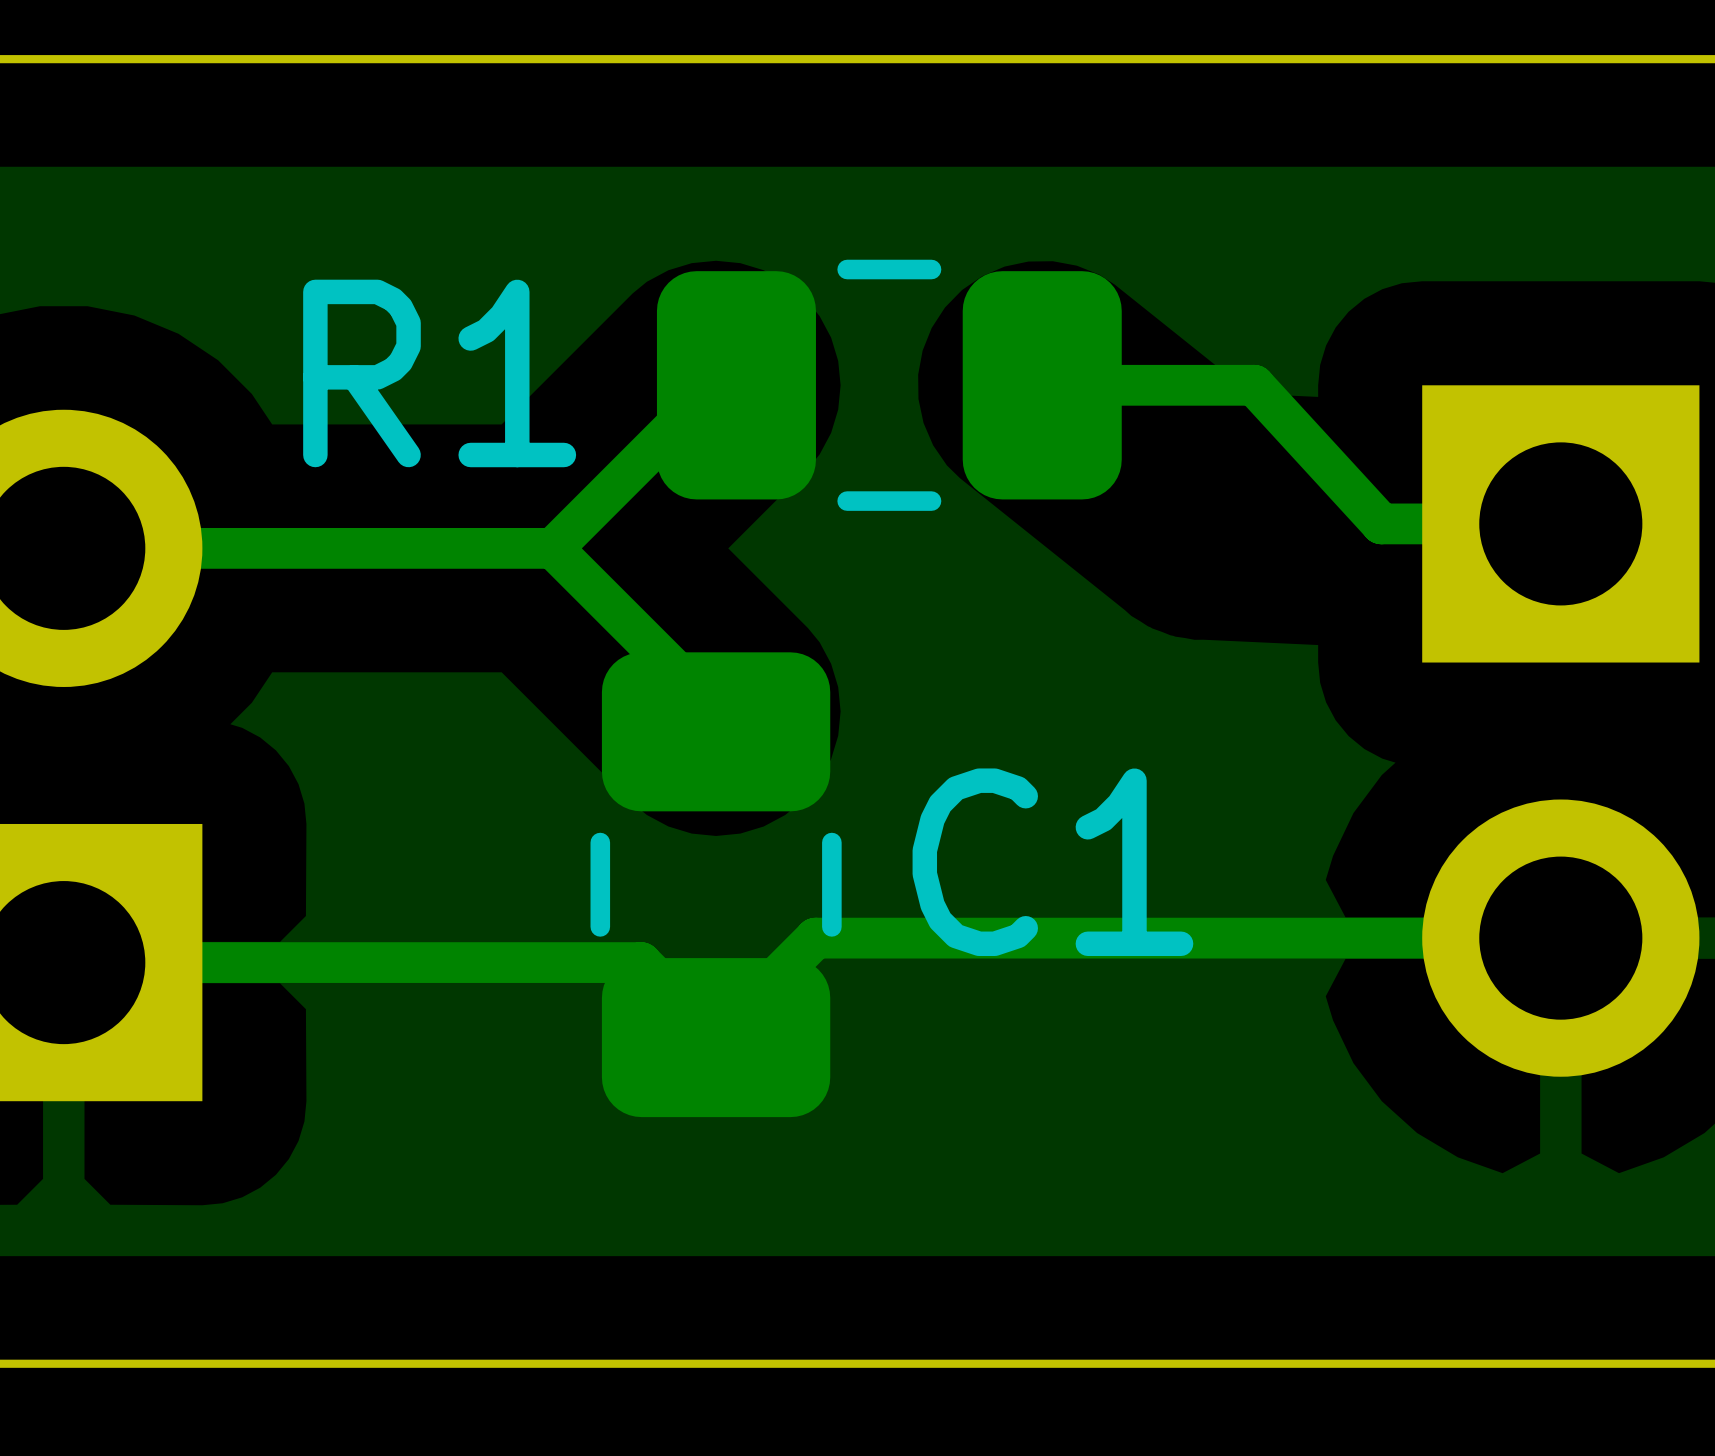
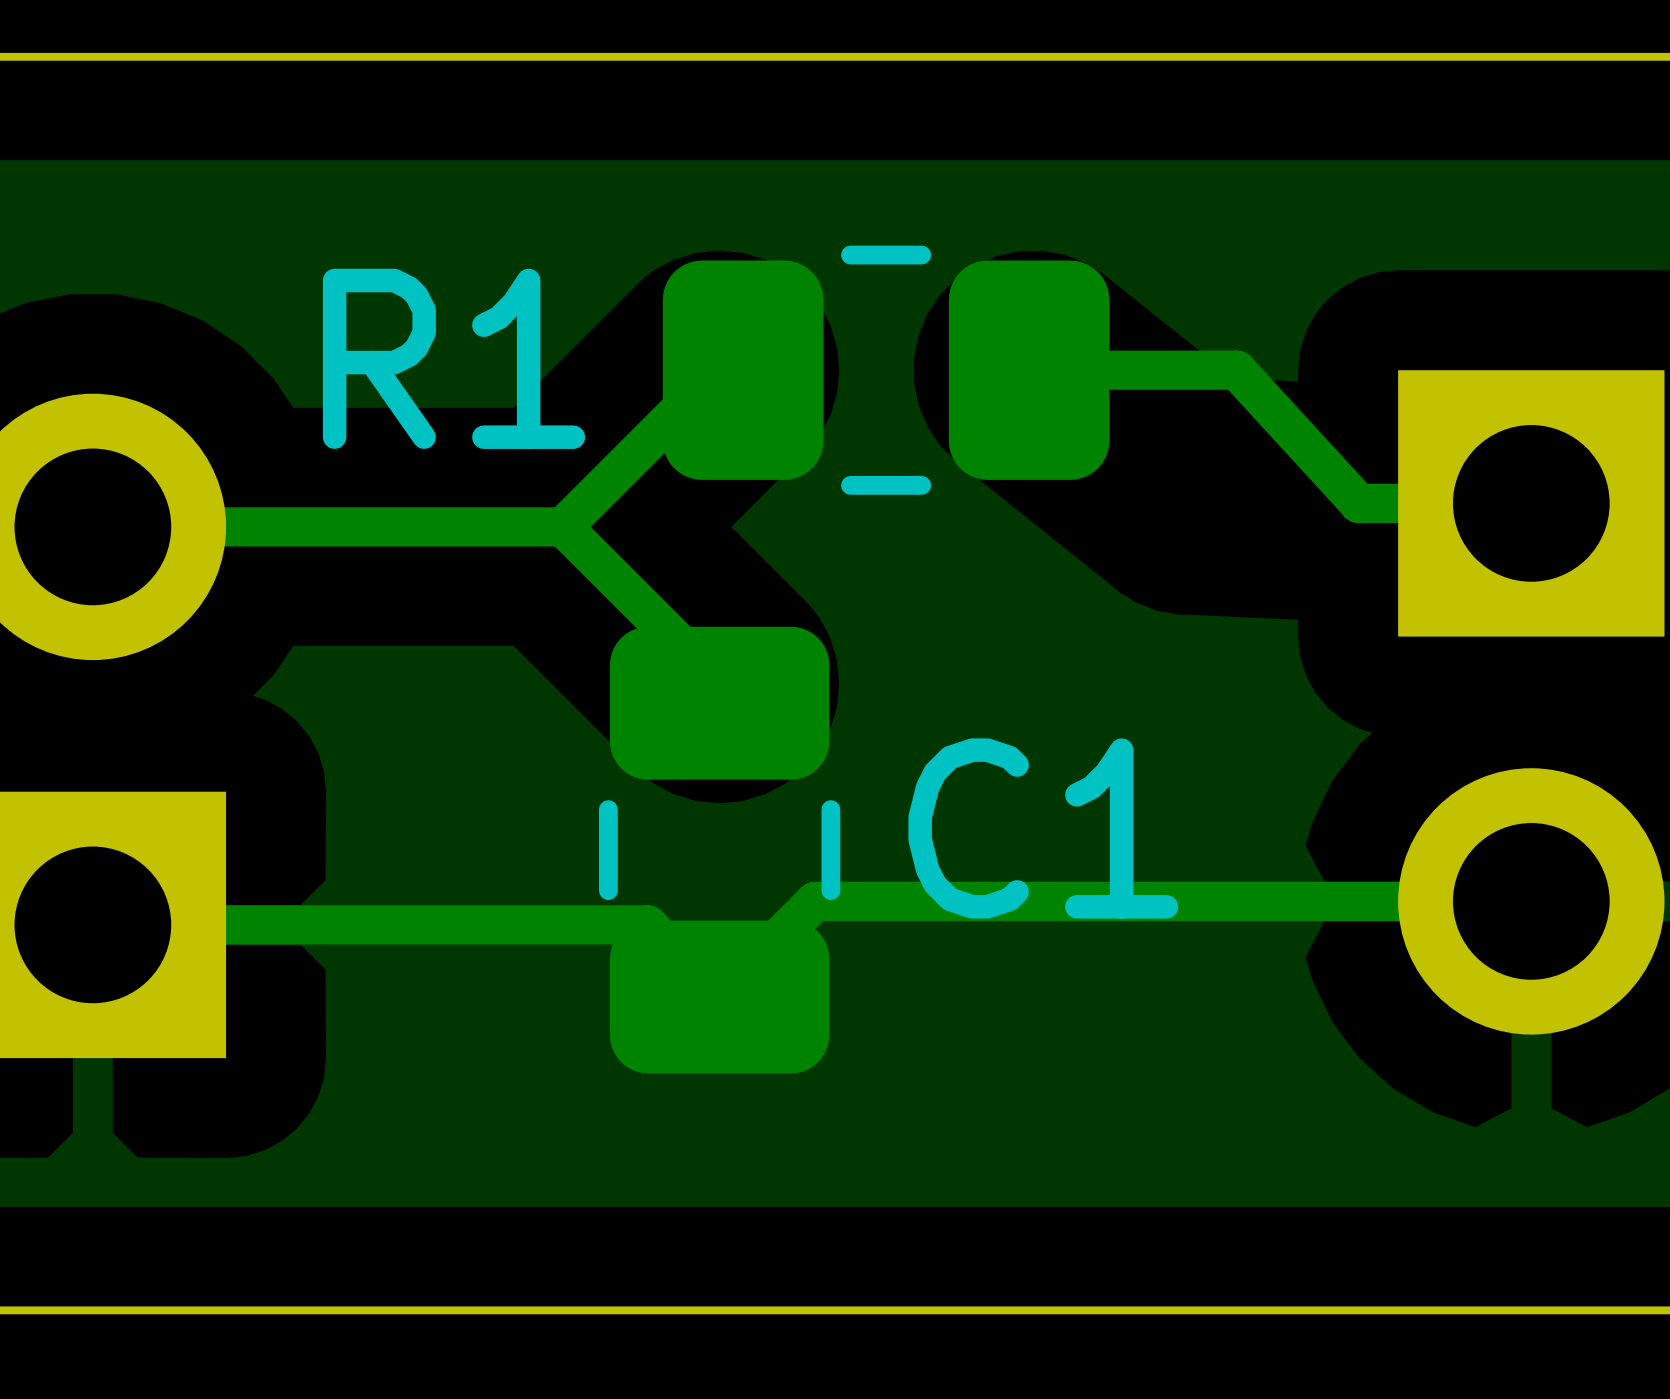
R1 footprint: [656, 259, 1122, 511] -> [662, 245, 1110, 495]

